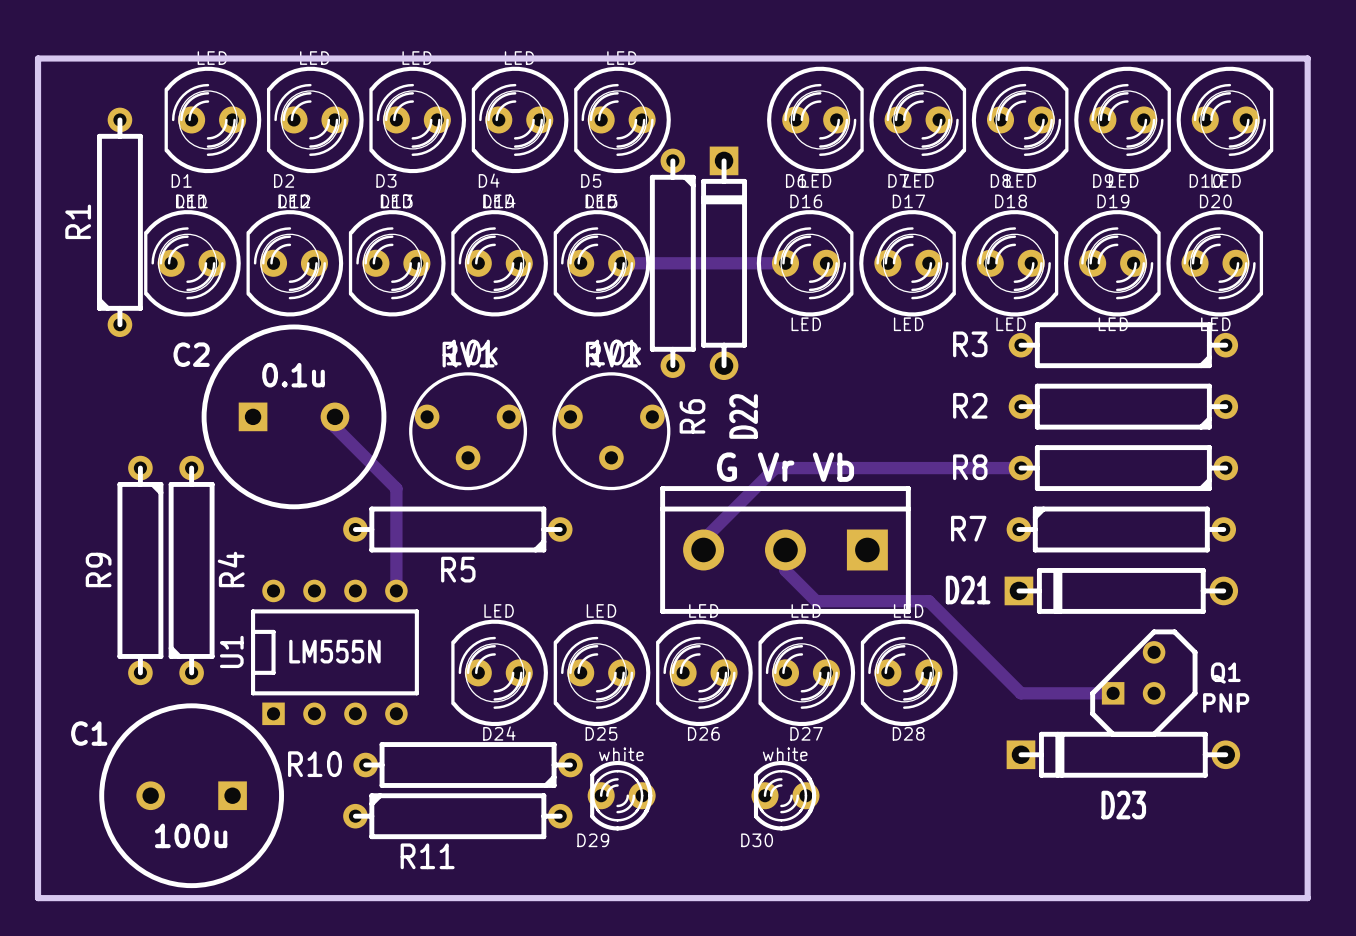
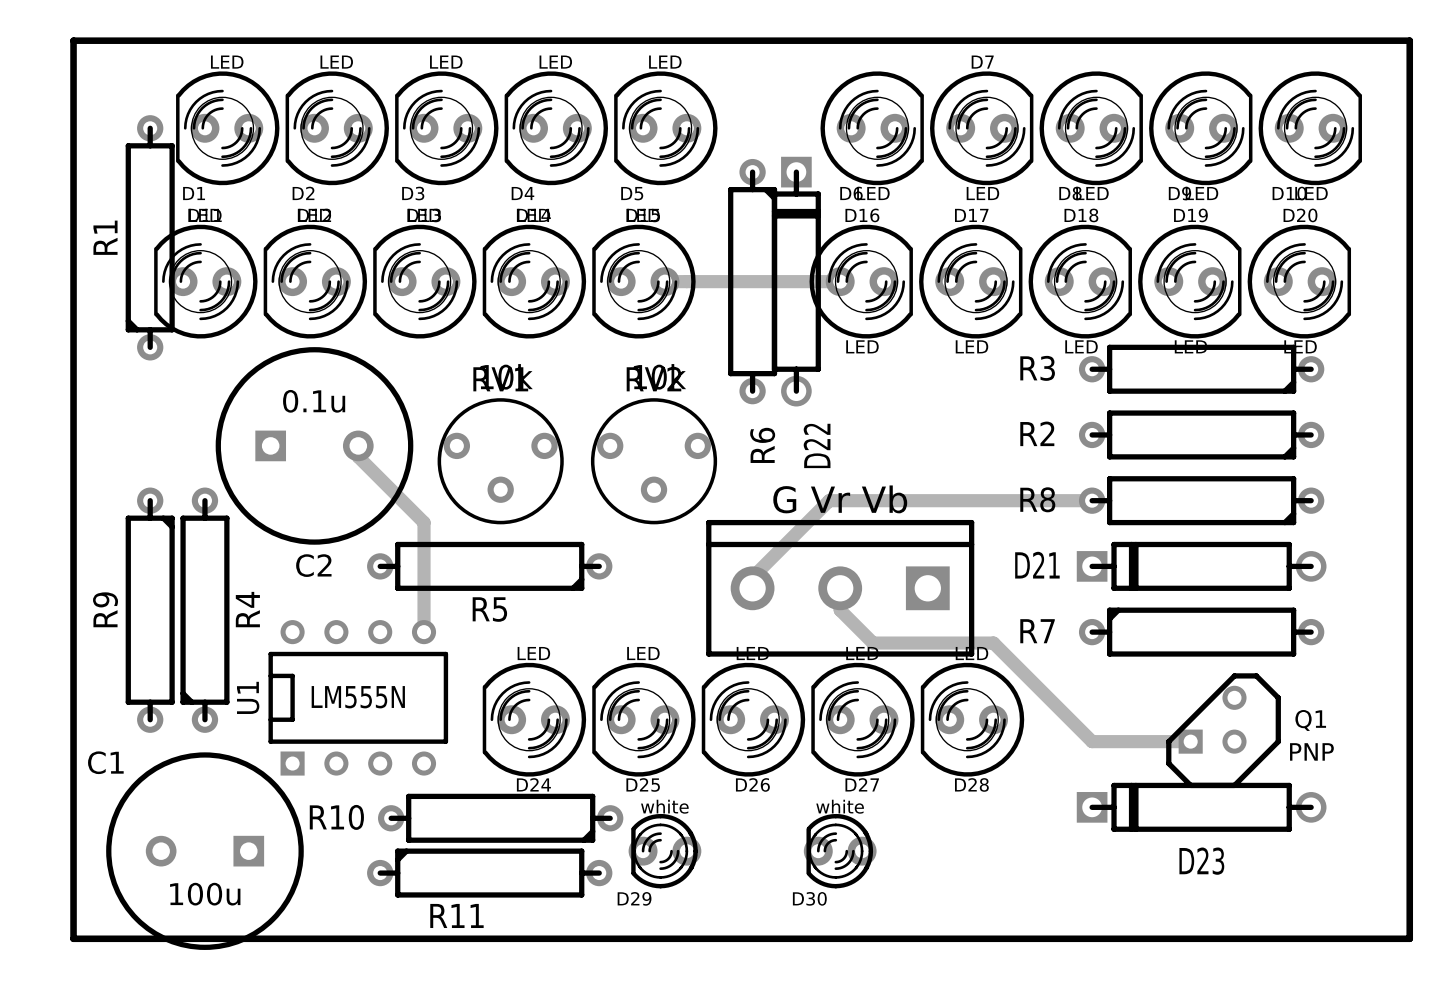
board edge: (38, 58) (38, 898) (1307, 898) (1307, 58) (38, 58) -> (73, 40) (73, 938) (1409, 938) (1409, 40) (73, 40)
D7 name position: D7 (898, 180) -> D7 (982, 62)
R1 position: (119, 222) -> (150, 237)
R6 position: (672, 263) -> (752, 281)
D22 position: (724, 263) -> (796, 281)
C2 name position: C2 (191, 354) -> C2 (313, 565)
R6 name position: R6 (692, 416) -> R6 (762, 445)
R7 position: (1121, 529) -> (1201, 632)
D21 position: (1121, 590) -> (1201, 566)
C1 name position: C1 (89, 733) -> C1 (105, 762)

